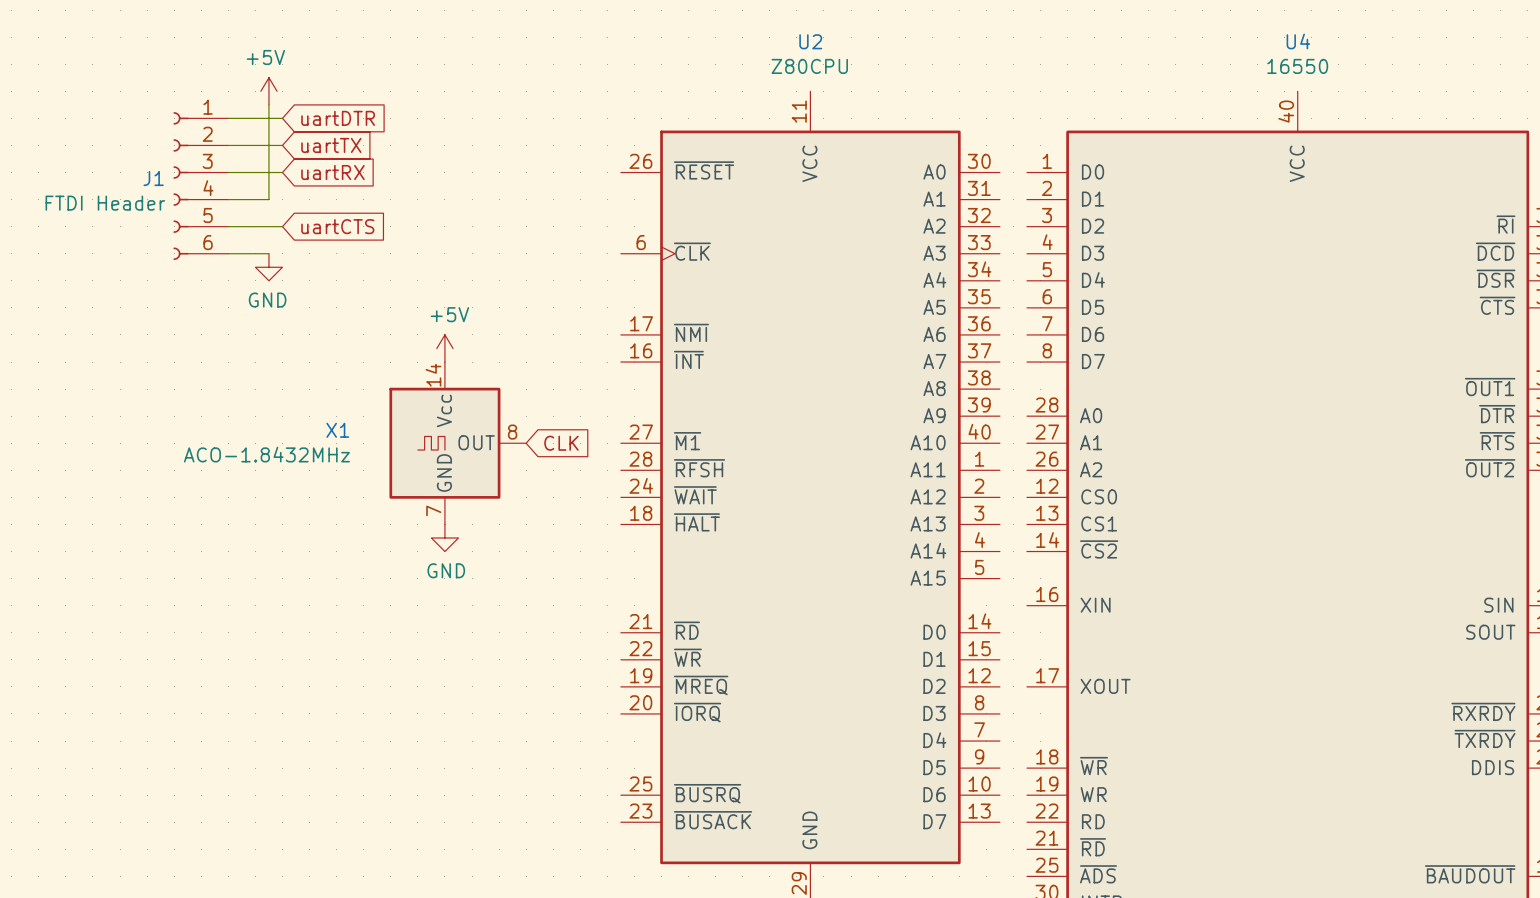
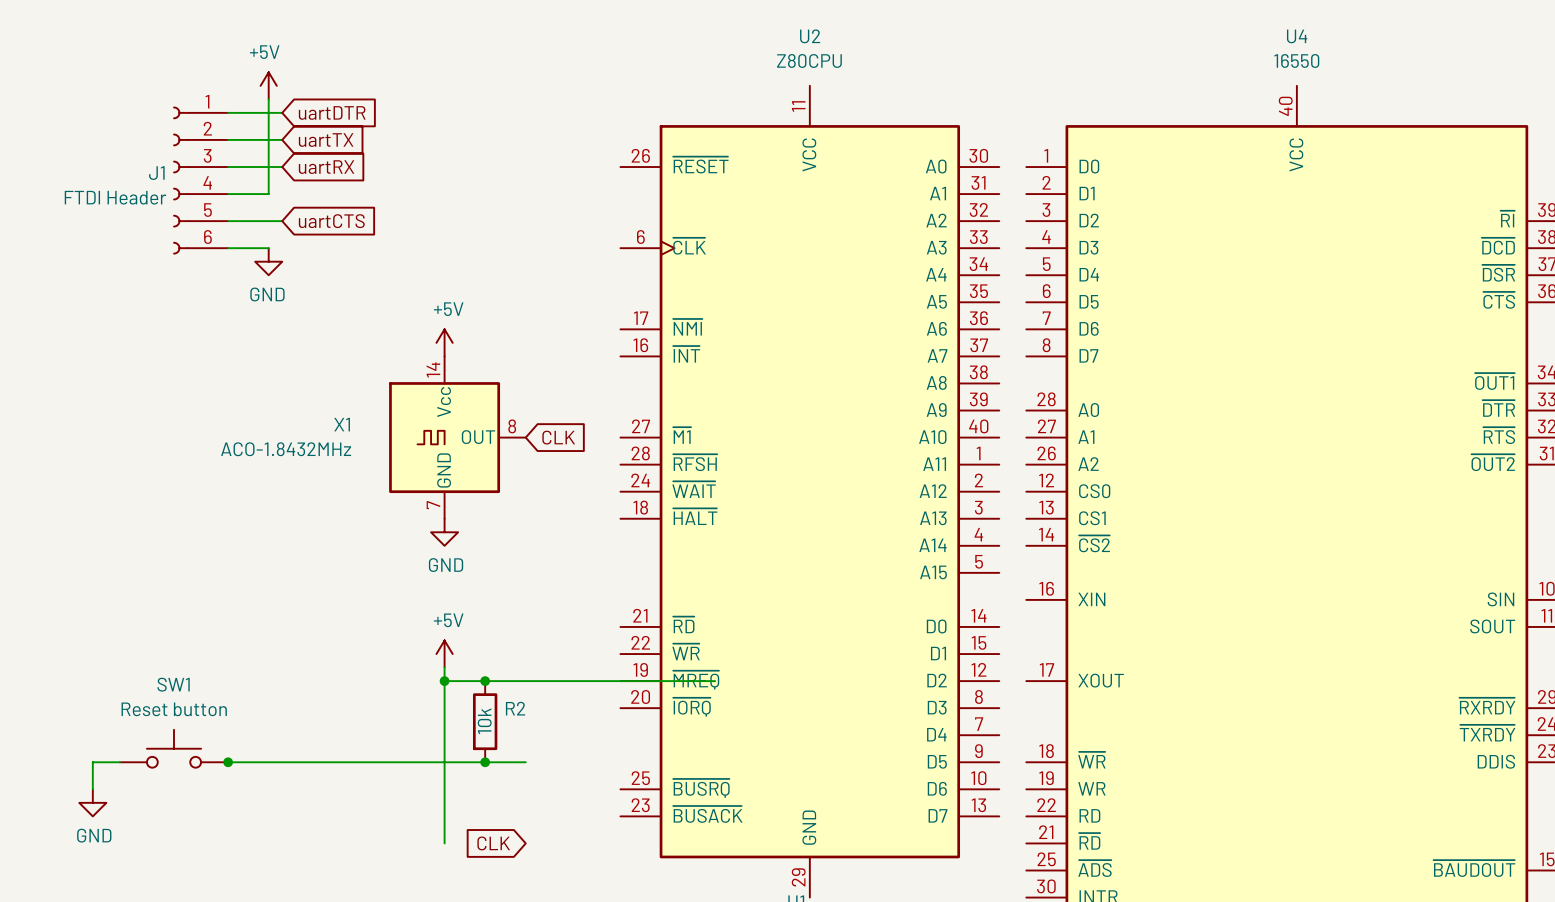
power symbol: none -> +5V (444, 654)
wire: none -> (444, 667) (444, 843)
wire: none -> (444, 681) (715, 681)
junction: none -> (444, 681)
junction: none -> (485, 681)
R2: none -> 10k (485, 721)
SW1: none -> Reset button (174, 748)
wire: none -> (119, 762) (92, 762) (92, 789)
wire: none -> (228, 762) (525, 762)
junction: none -> (228, 762)
junction: none -> (485, 762)
power symbol: none -> GND (92, 802)
global label: none -> CLK (493, 843)

